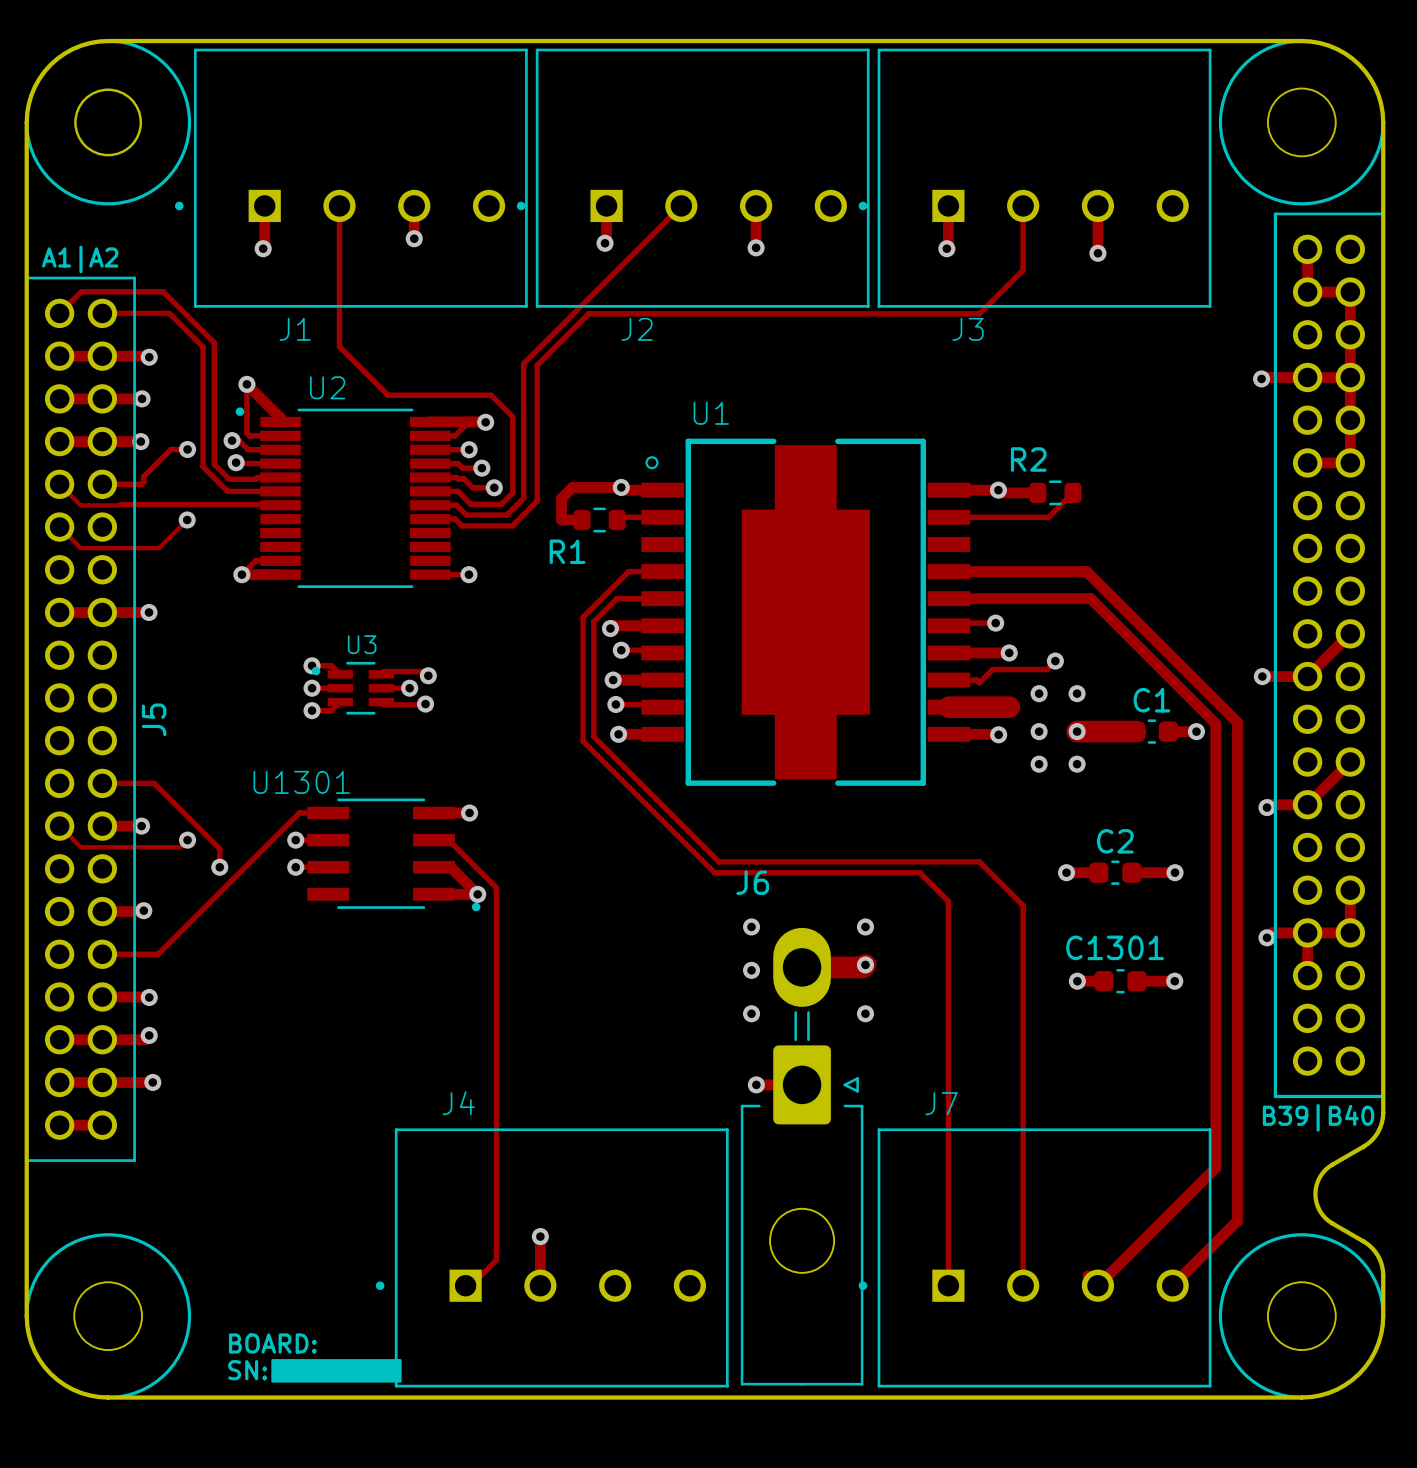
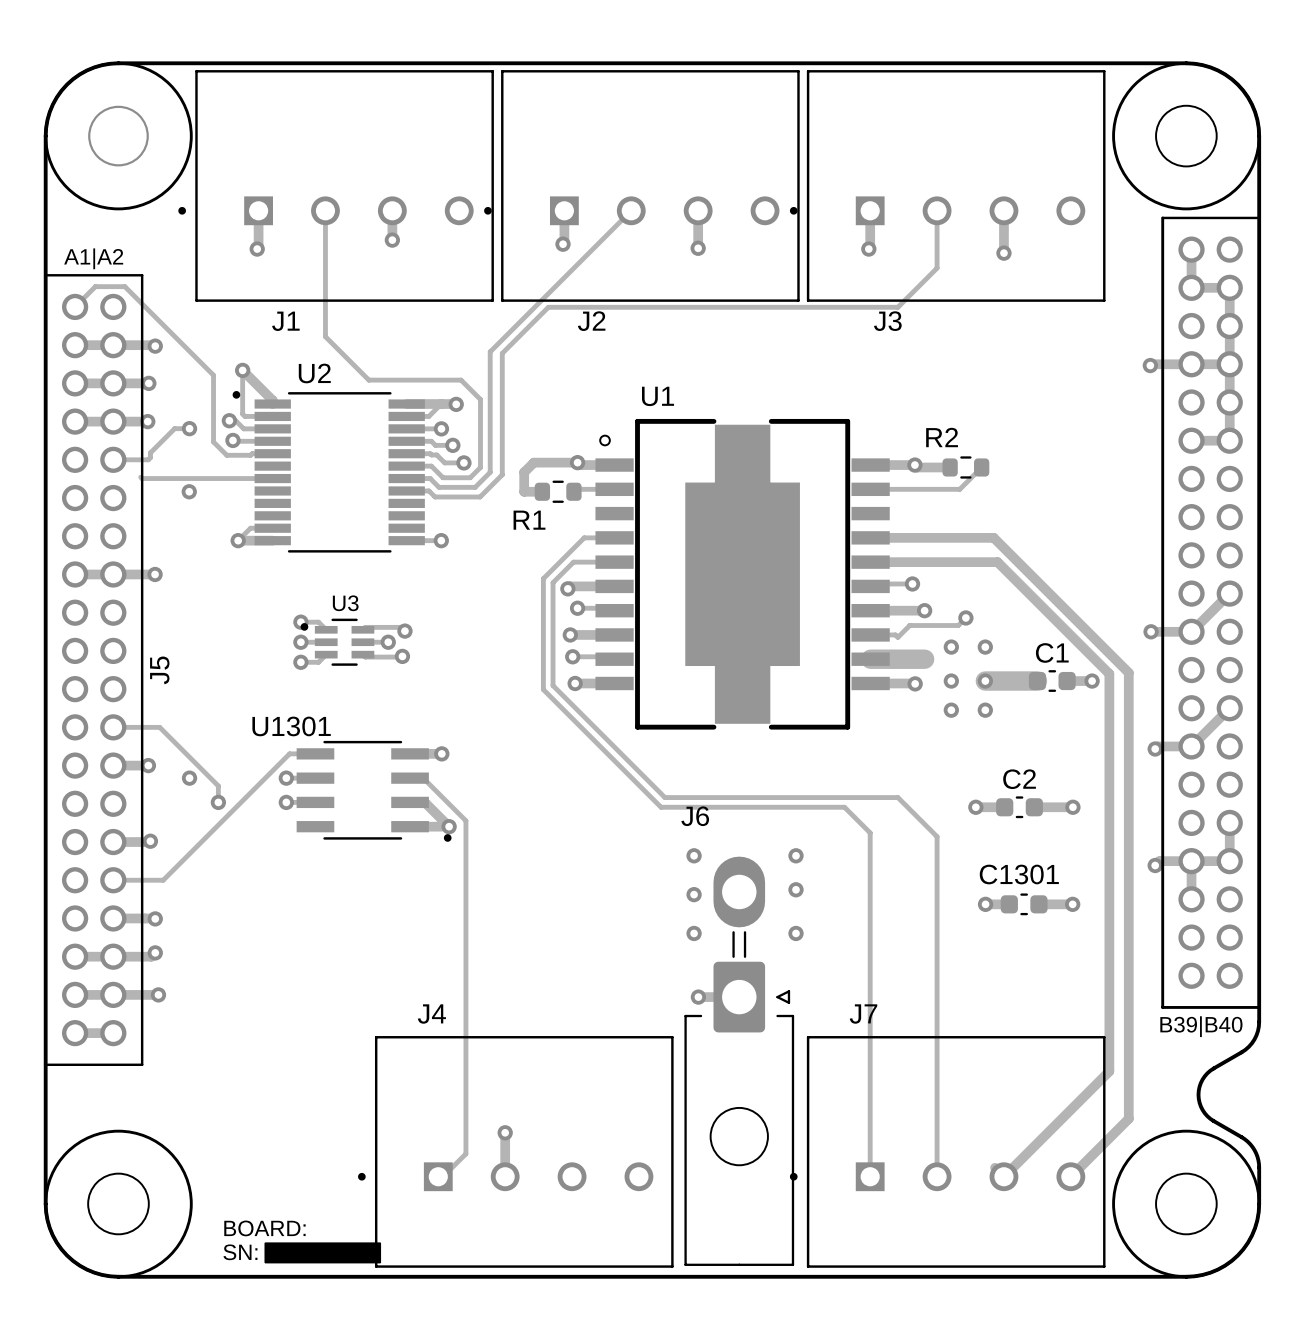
track: (81, 291) (163, 291) (214, 342) (214, 389) -> (94, 287) (124, 286) (213, 375)
track: (102, 313) (169, 313) (203, 347) (203, 466) (227, 491) (280, 491) -> none
track: (59, 484) (80, 505) (280, 505) -> (140, 477) (272, 478)
track: (187, 520) (159, 548) (80, 548) (59, 527) -> none
track: (59, 826) (80, 847) (180, 847) (187, 840) -> none
track: (865, 964) (863, 967) (805, 967) -> none

